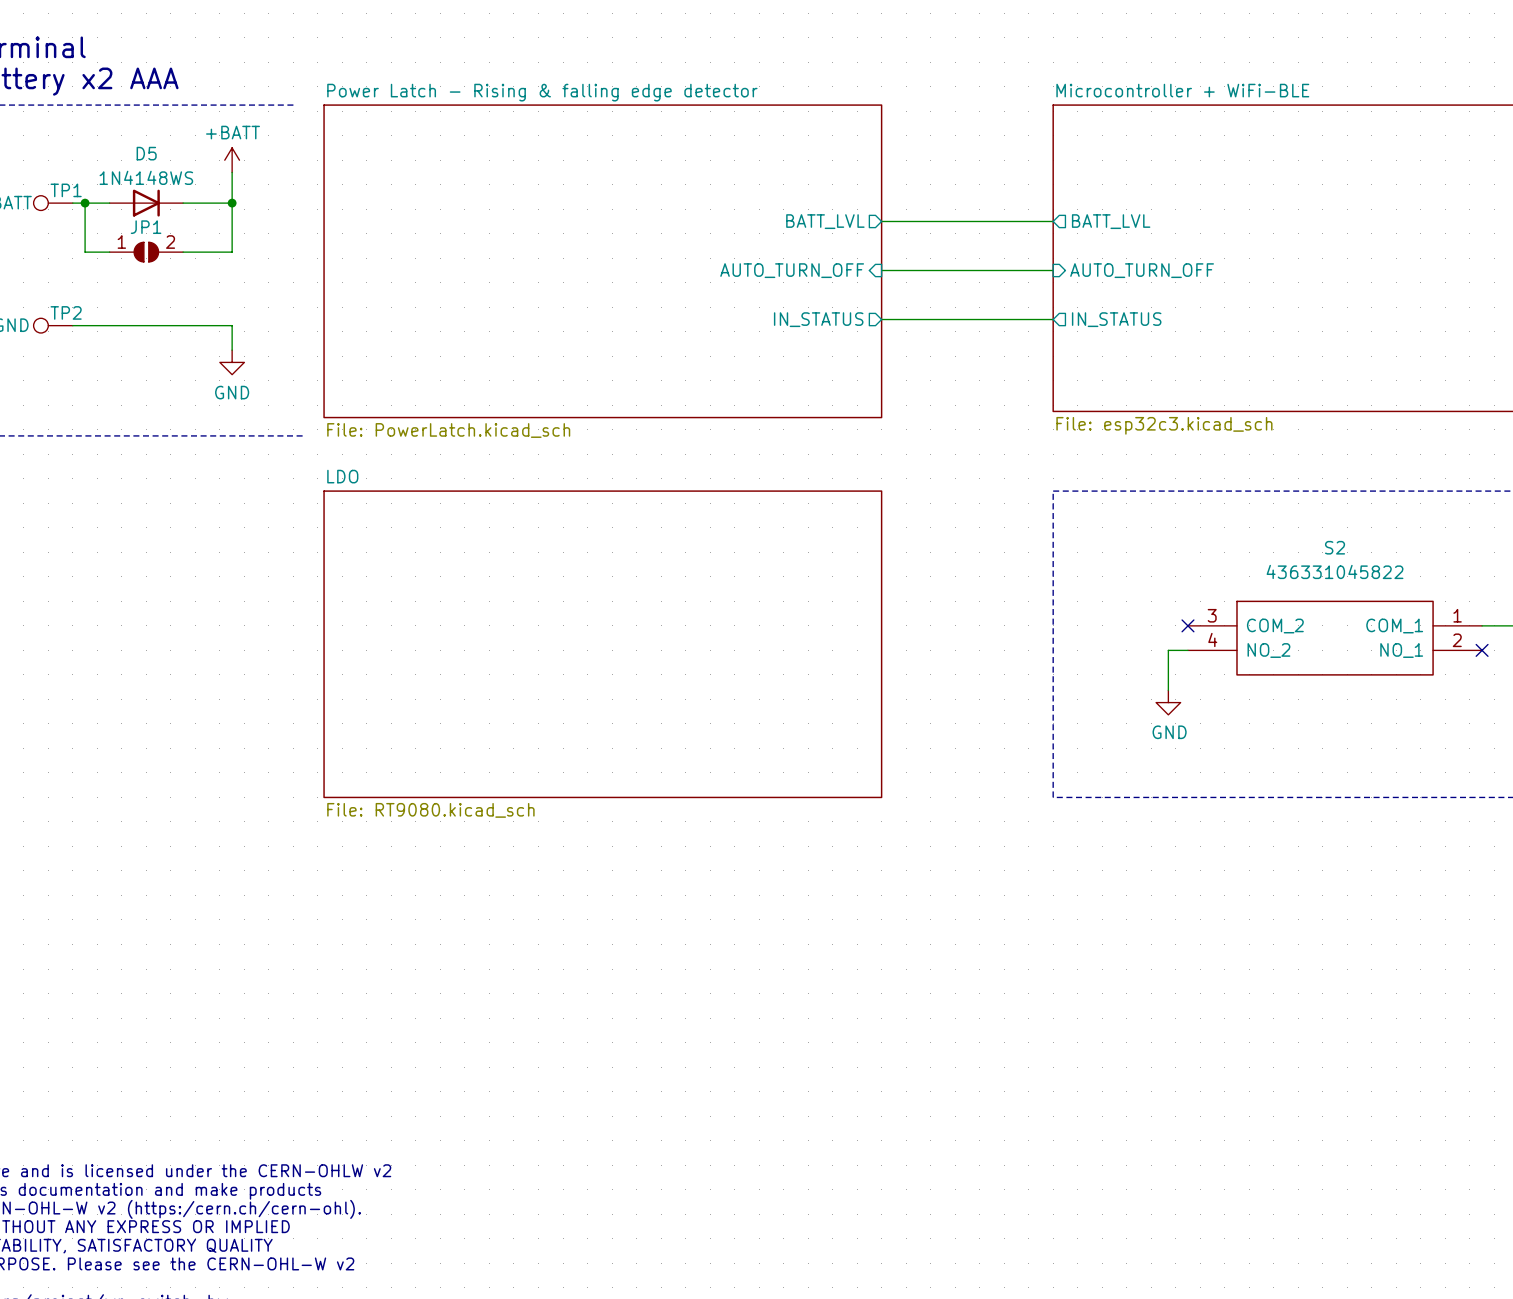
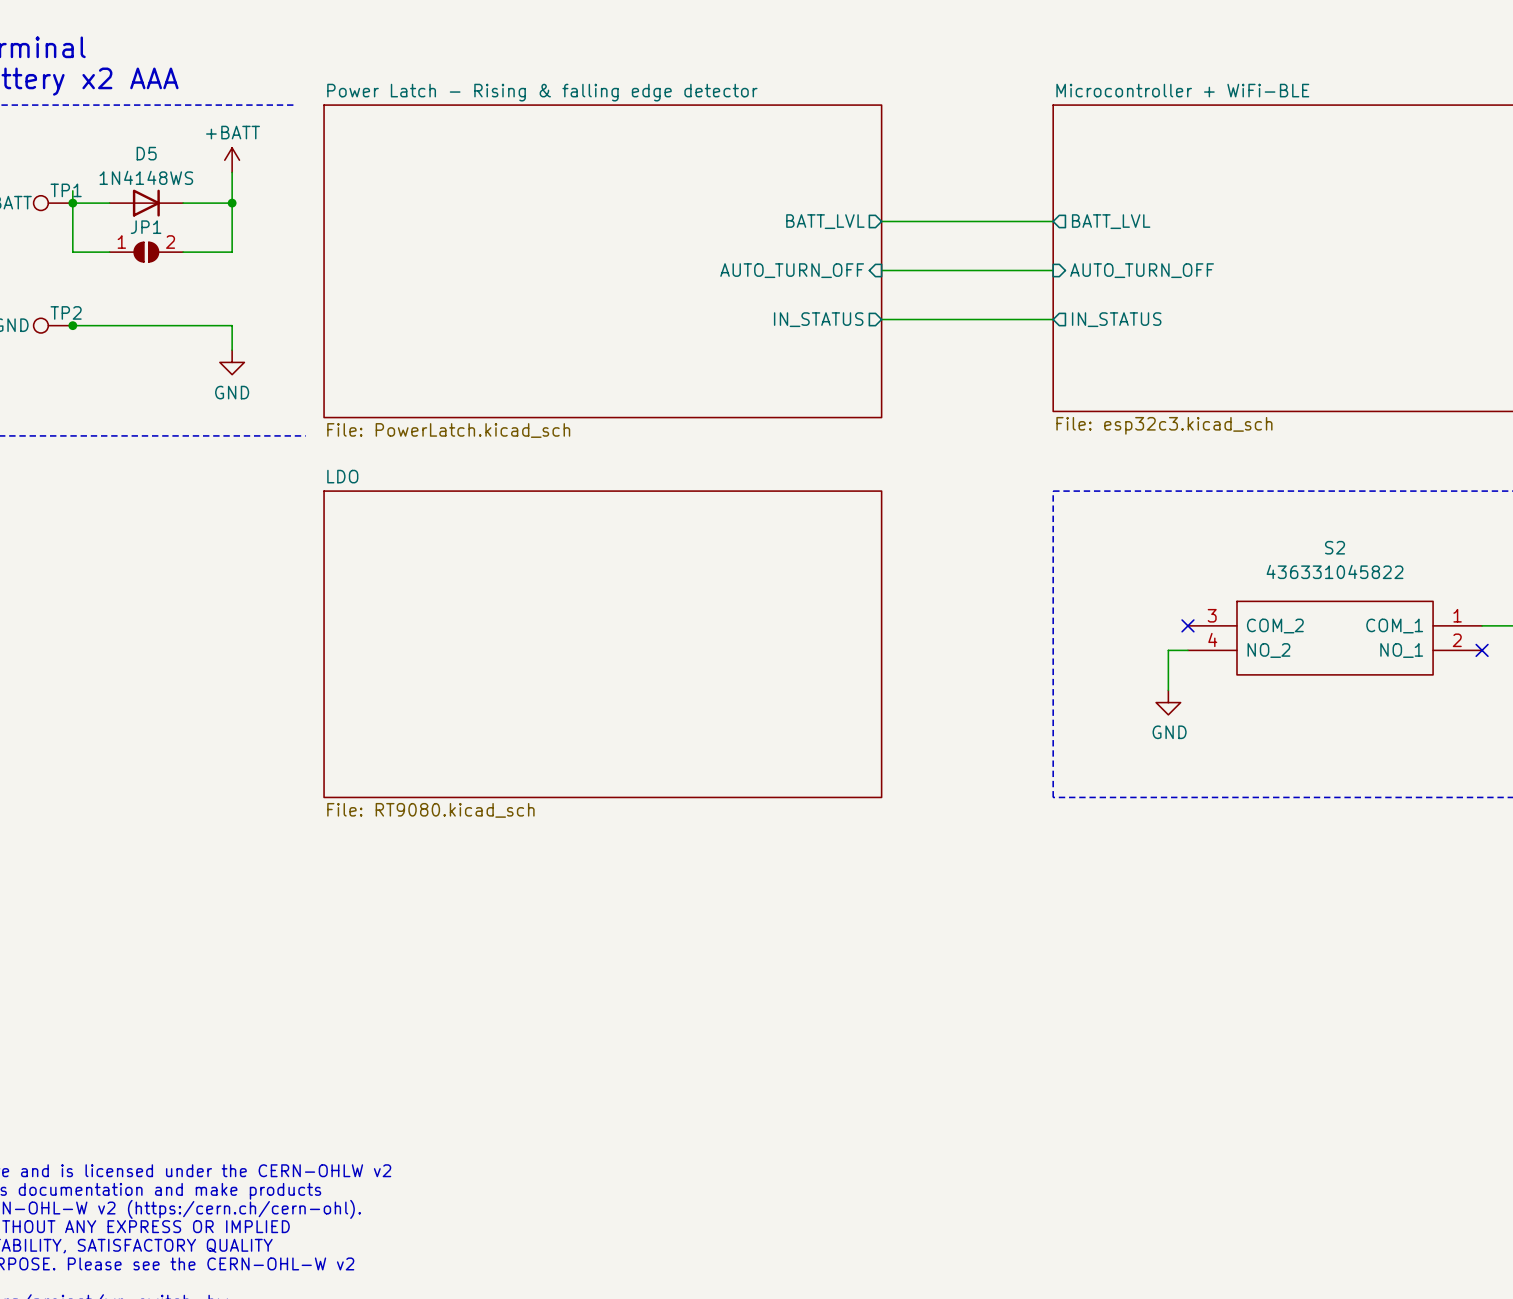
wire: (85, 203) (85, 252) -> (72, 190) (72, 252) (85, 252)
junction position: (85, 203) -> (72, 203)
junction: none -> (72, 325)

